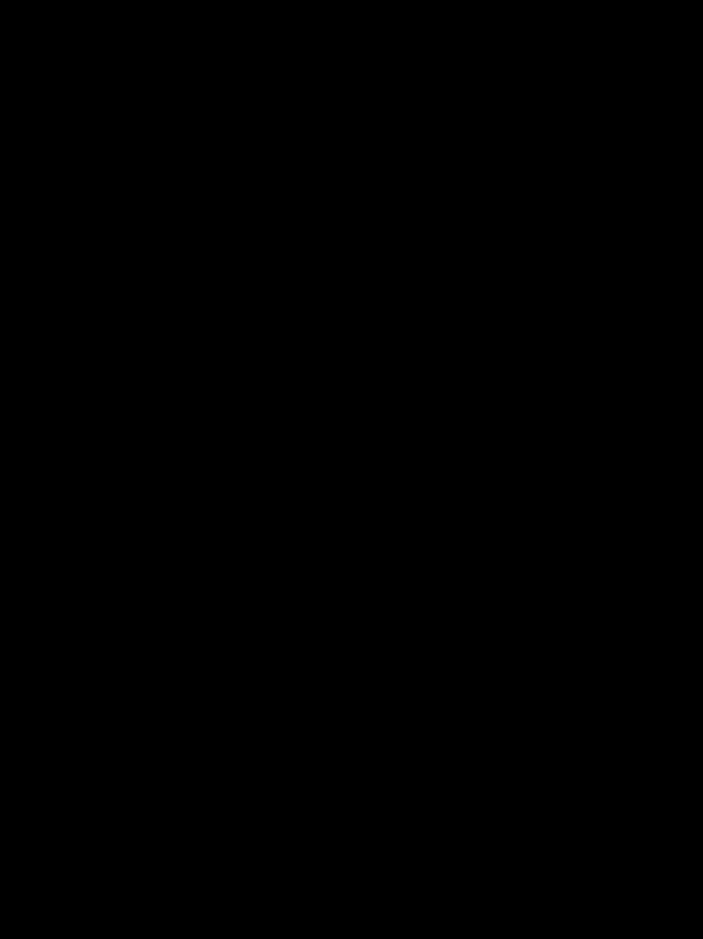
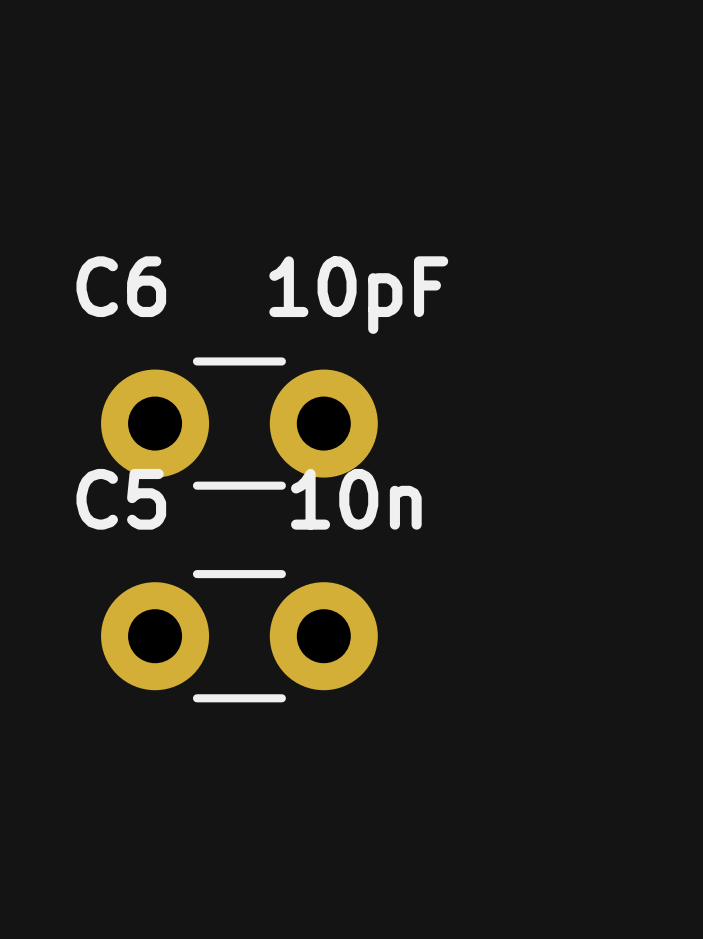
C6: none -> 10pF (239, 423)
C5: none -> 10n (239, 636)

